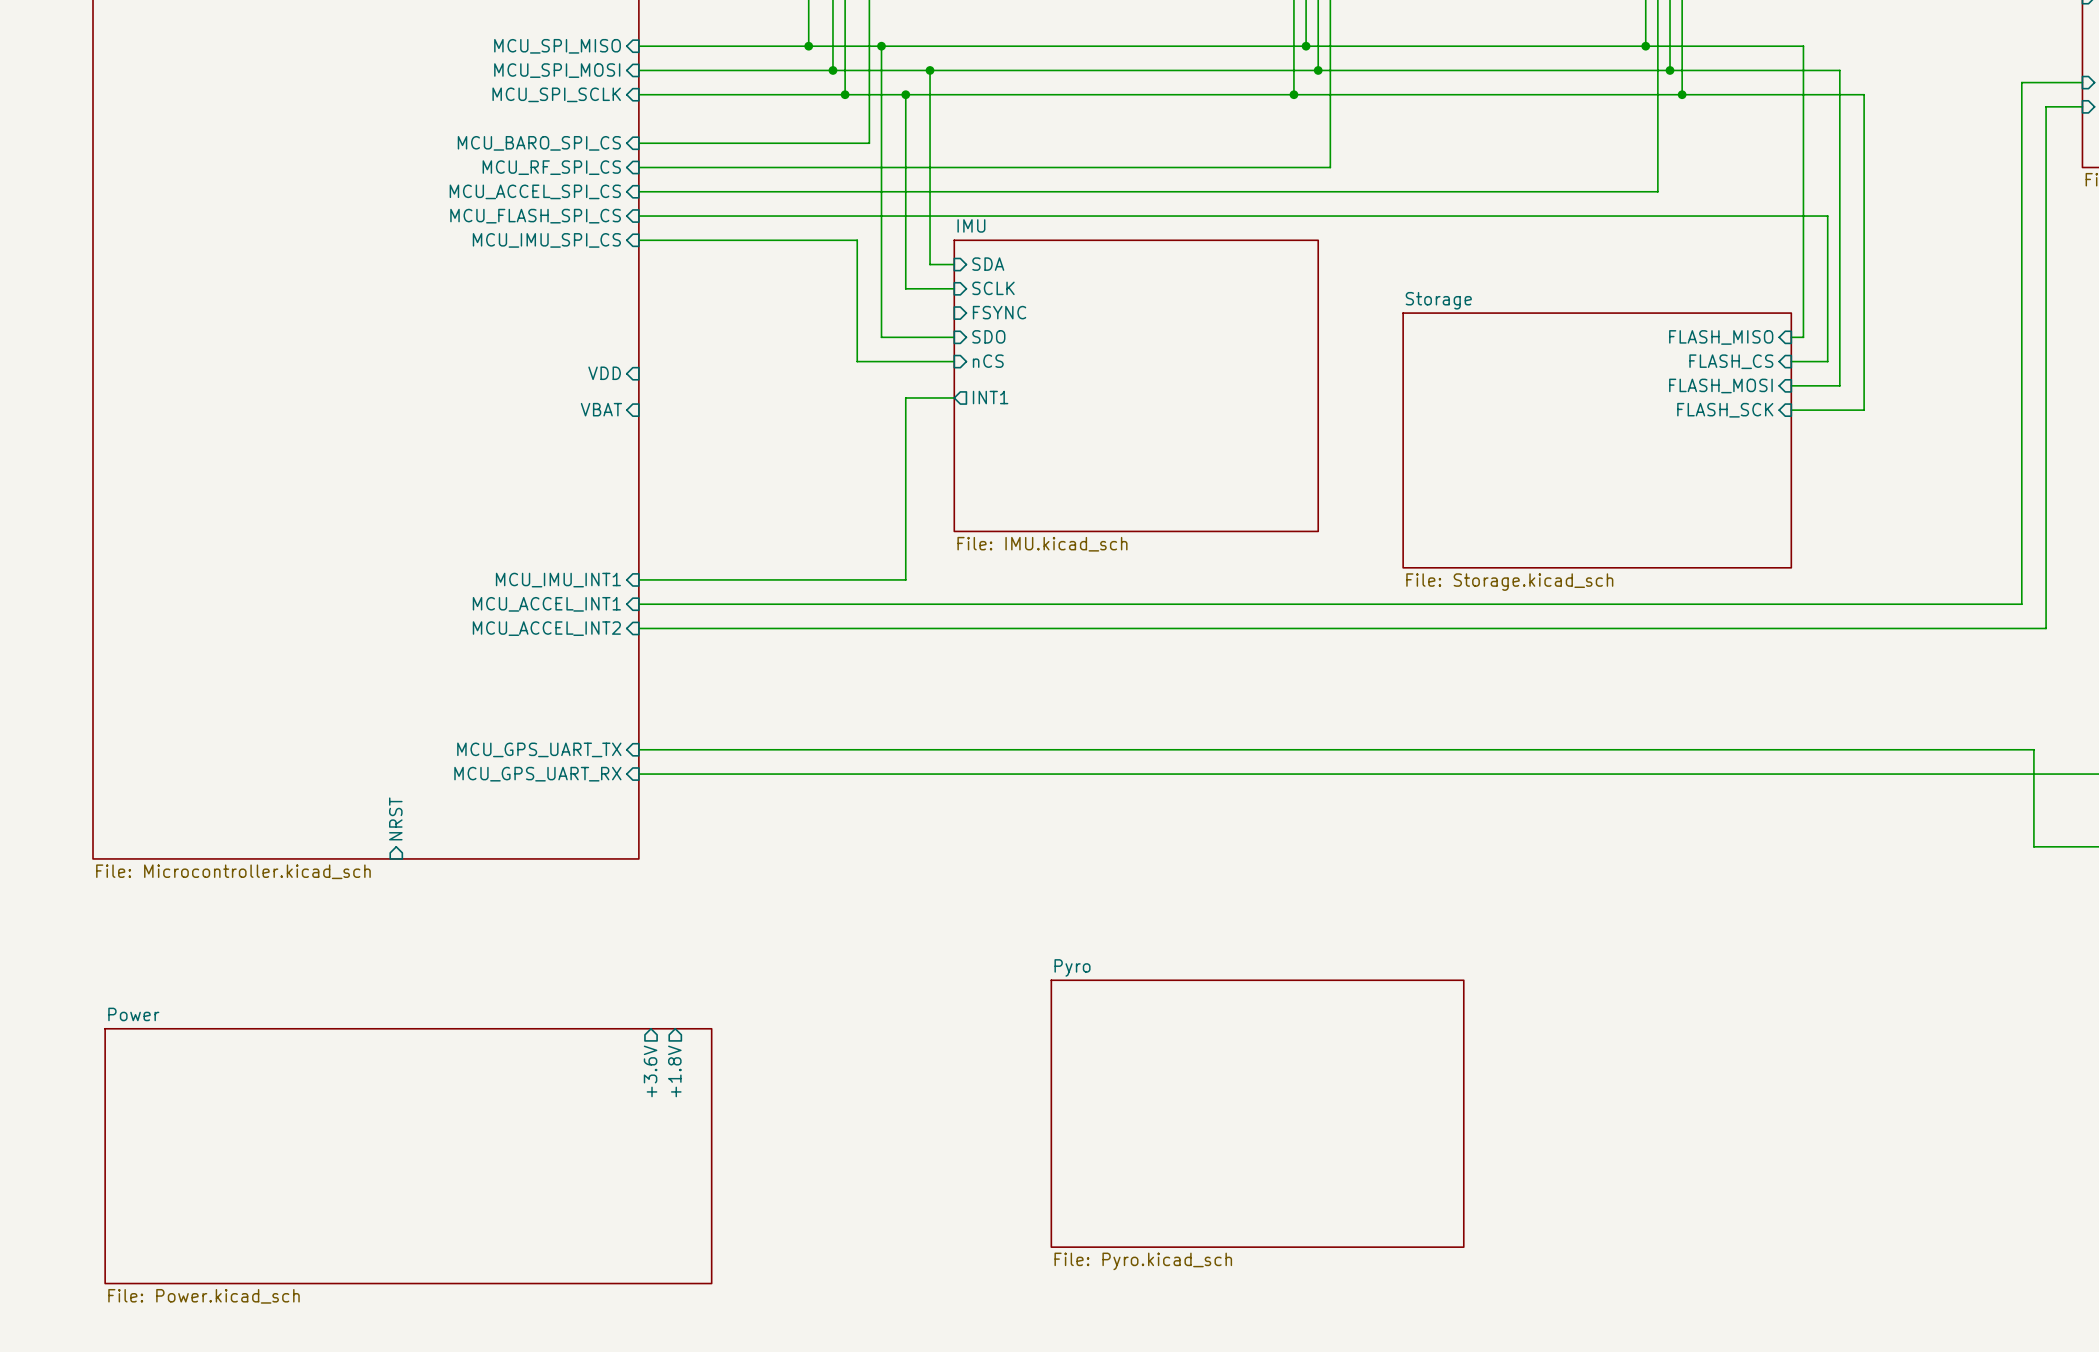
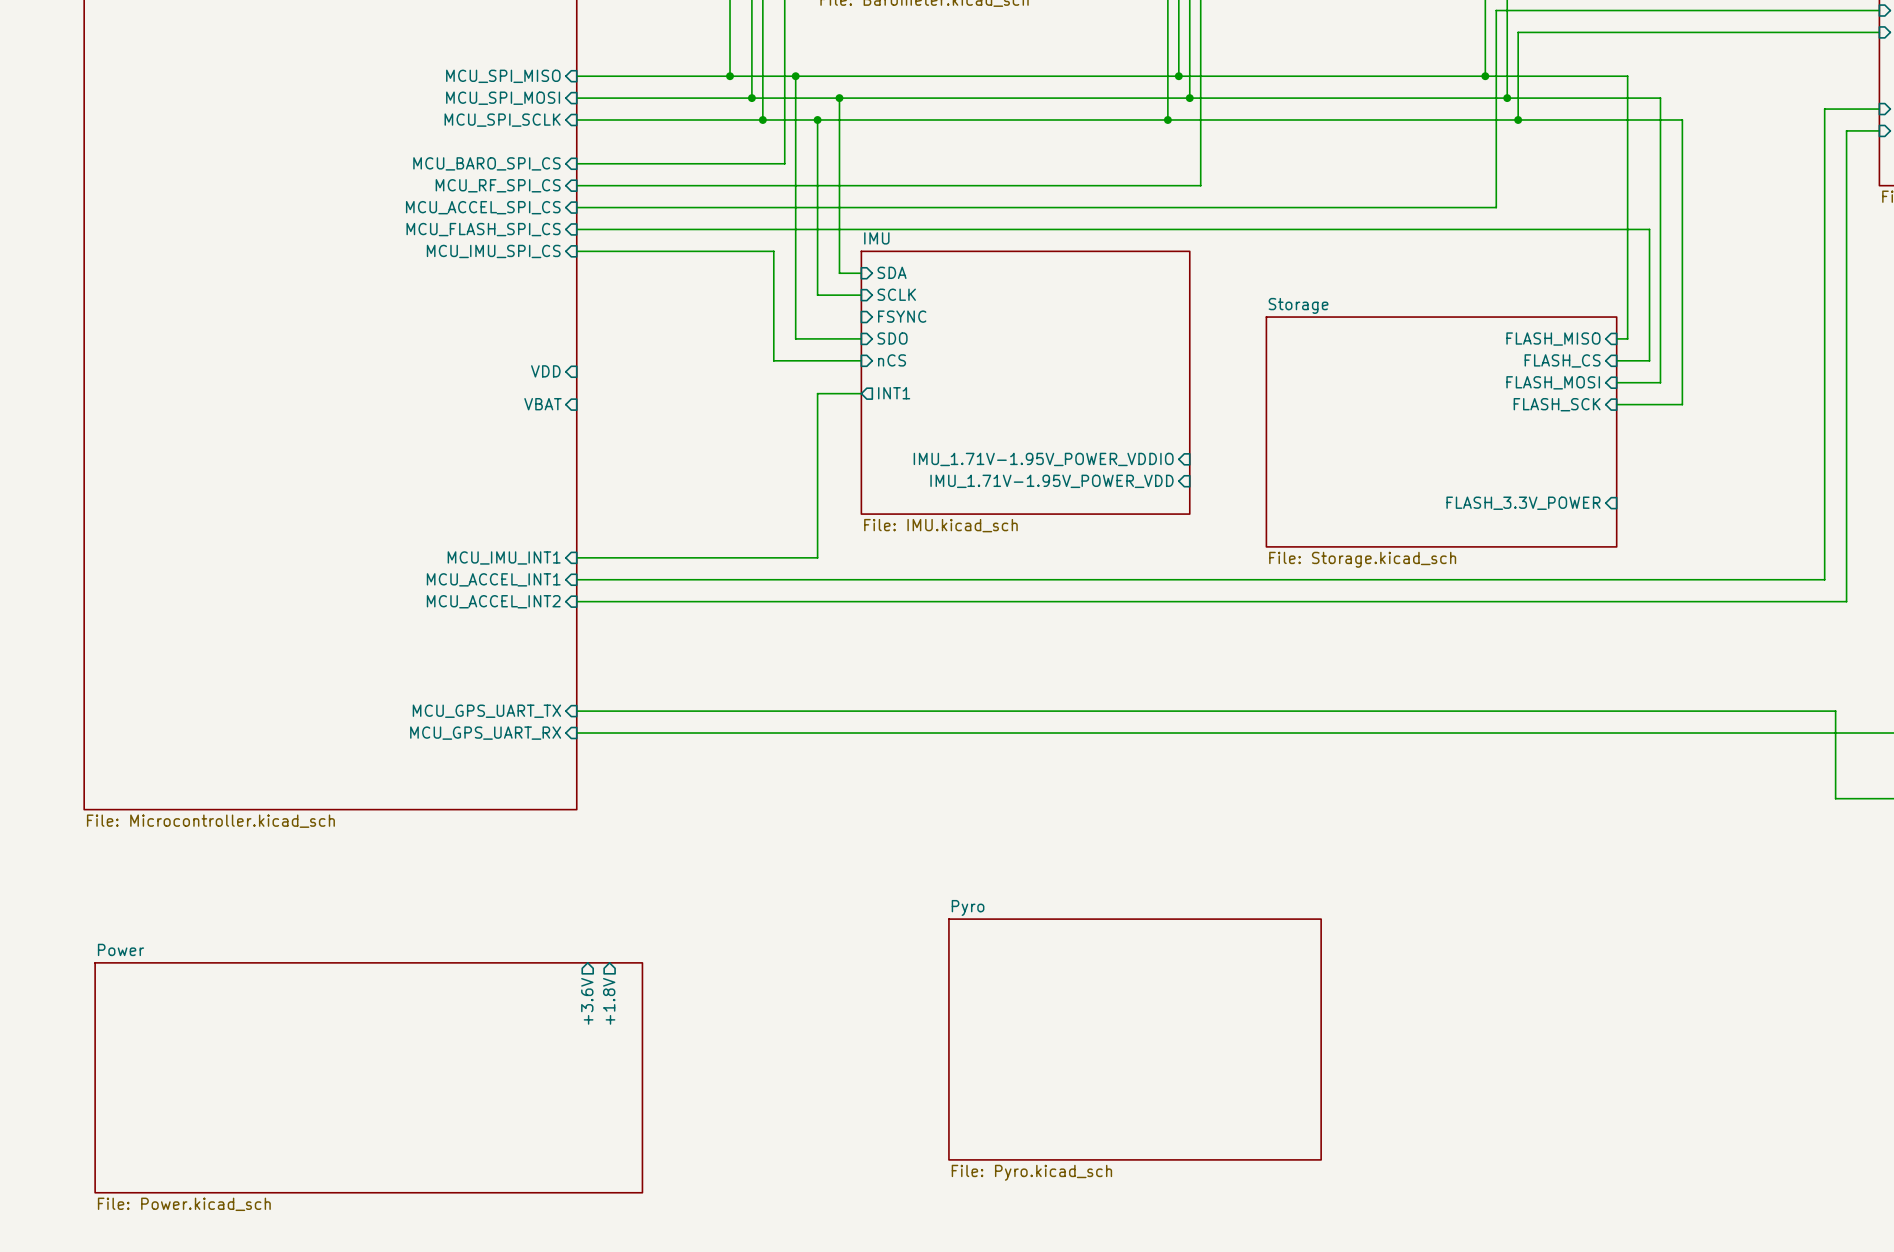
sheet pin: none -> IMU_1.71V-1.95V_POWER_VDDIO (1043, 459)
sheet pin: none -> IMU_1.71V-1.95V_POWER_VDD (1051, 481)
sheet pin: none -> FLASH_3.3V_POWER (1523, 503)
sheet pin: NRST (395, 818) -> none

